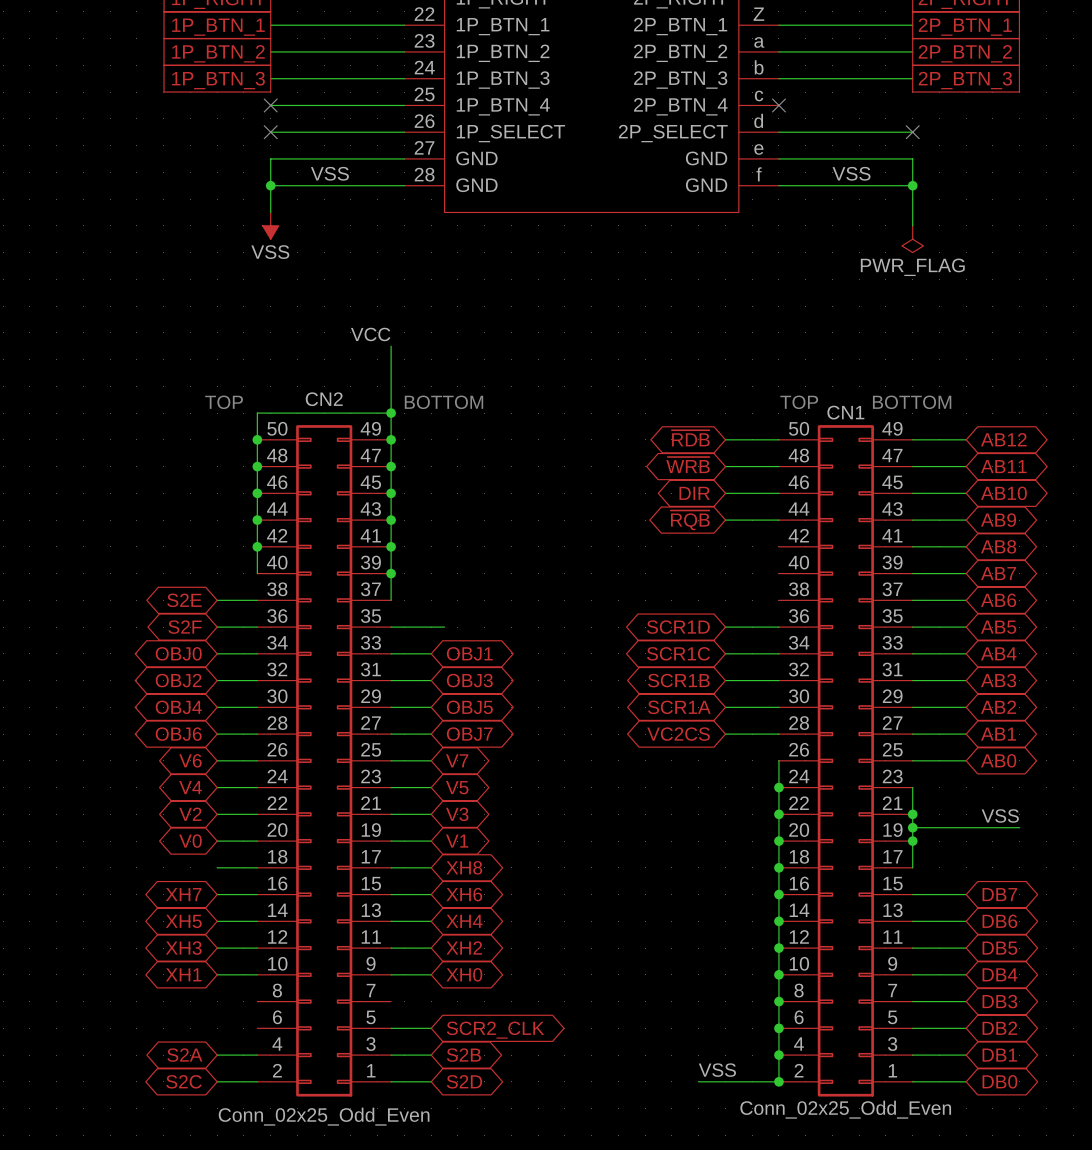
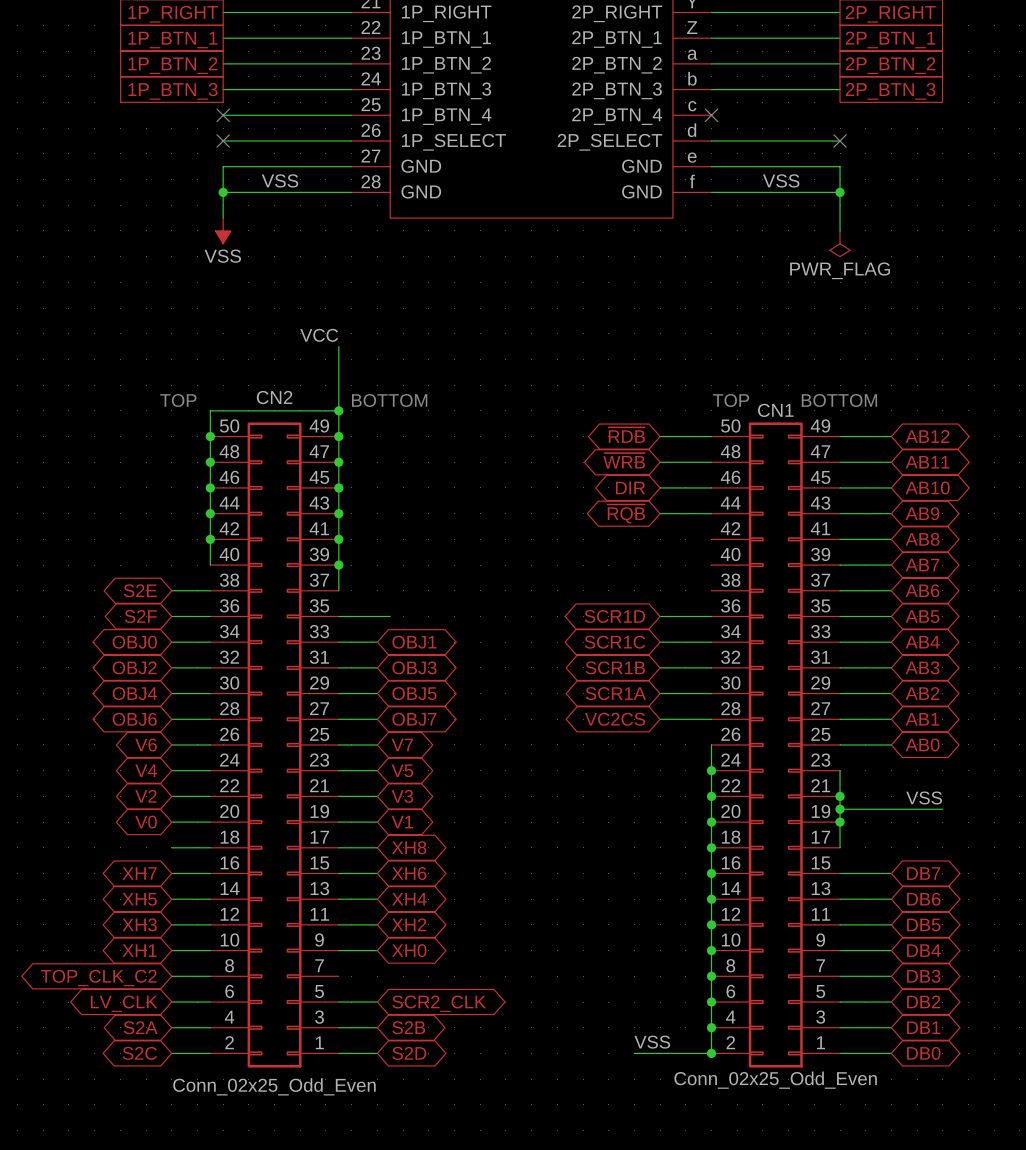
wire: none -> (171, 976) (210, 976)
global label: none -> TOP_CLK_C2 (98, 978)
wire: none -> (171, 1002) (210, 1002)
global label: none -> LV_CLK (124, 1003)

